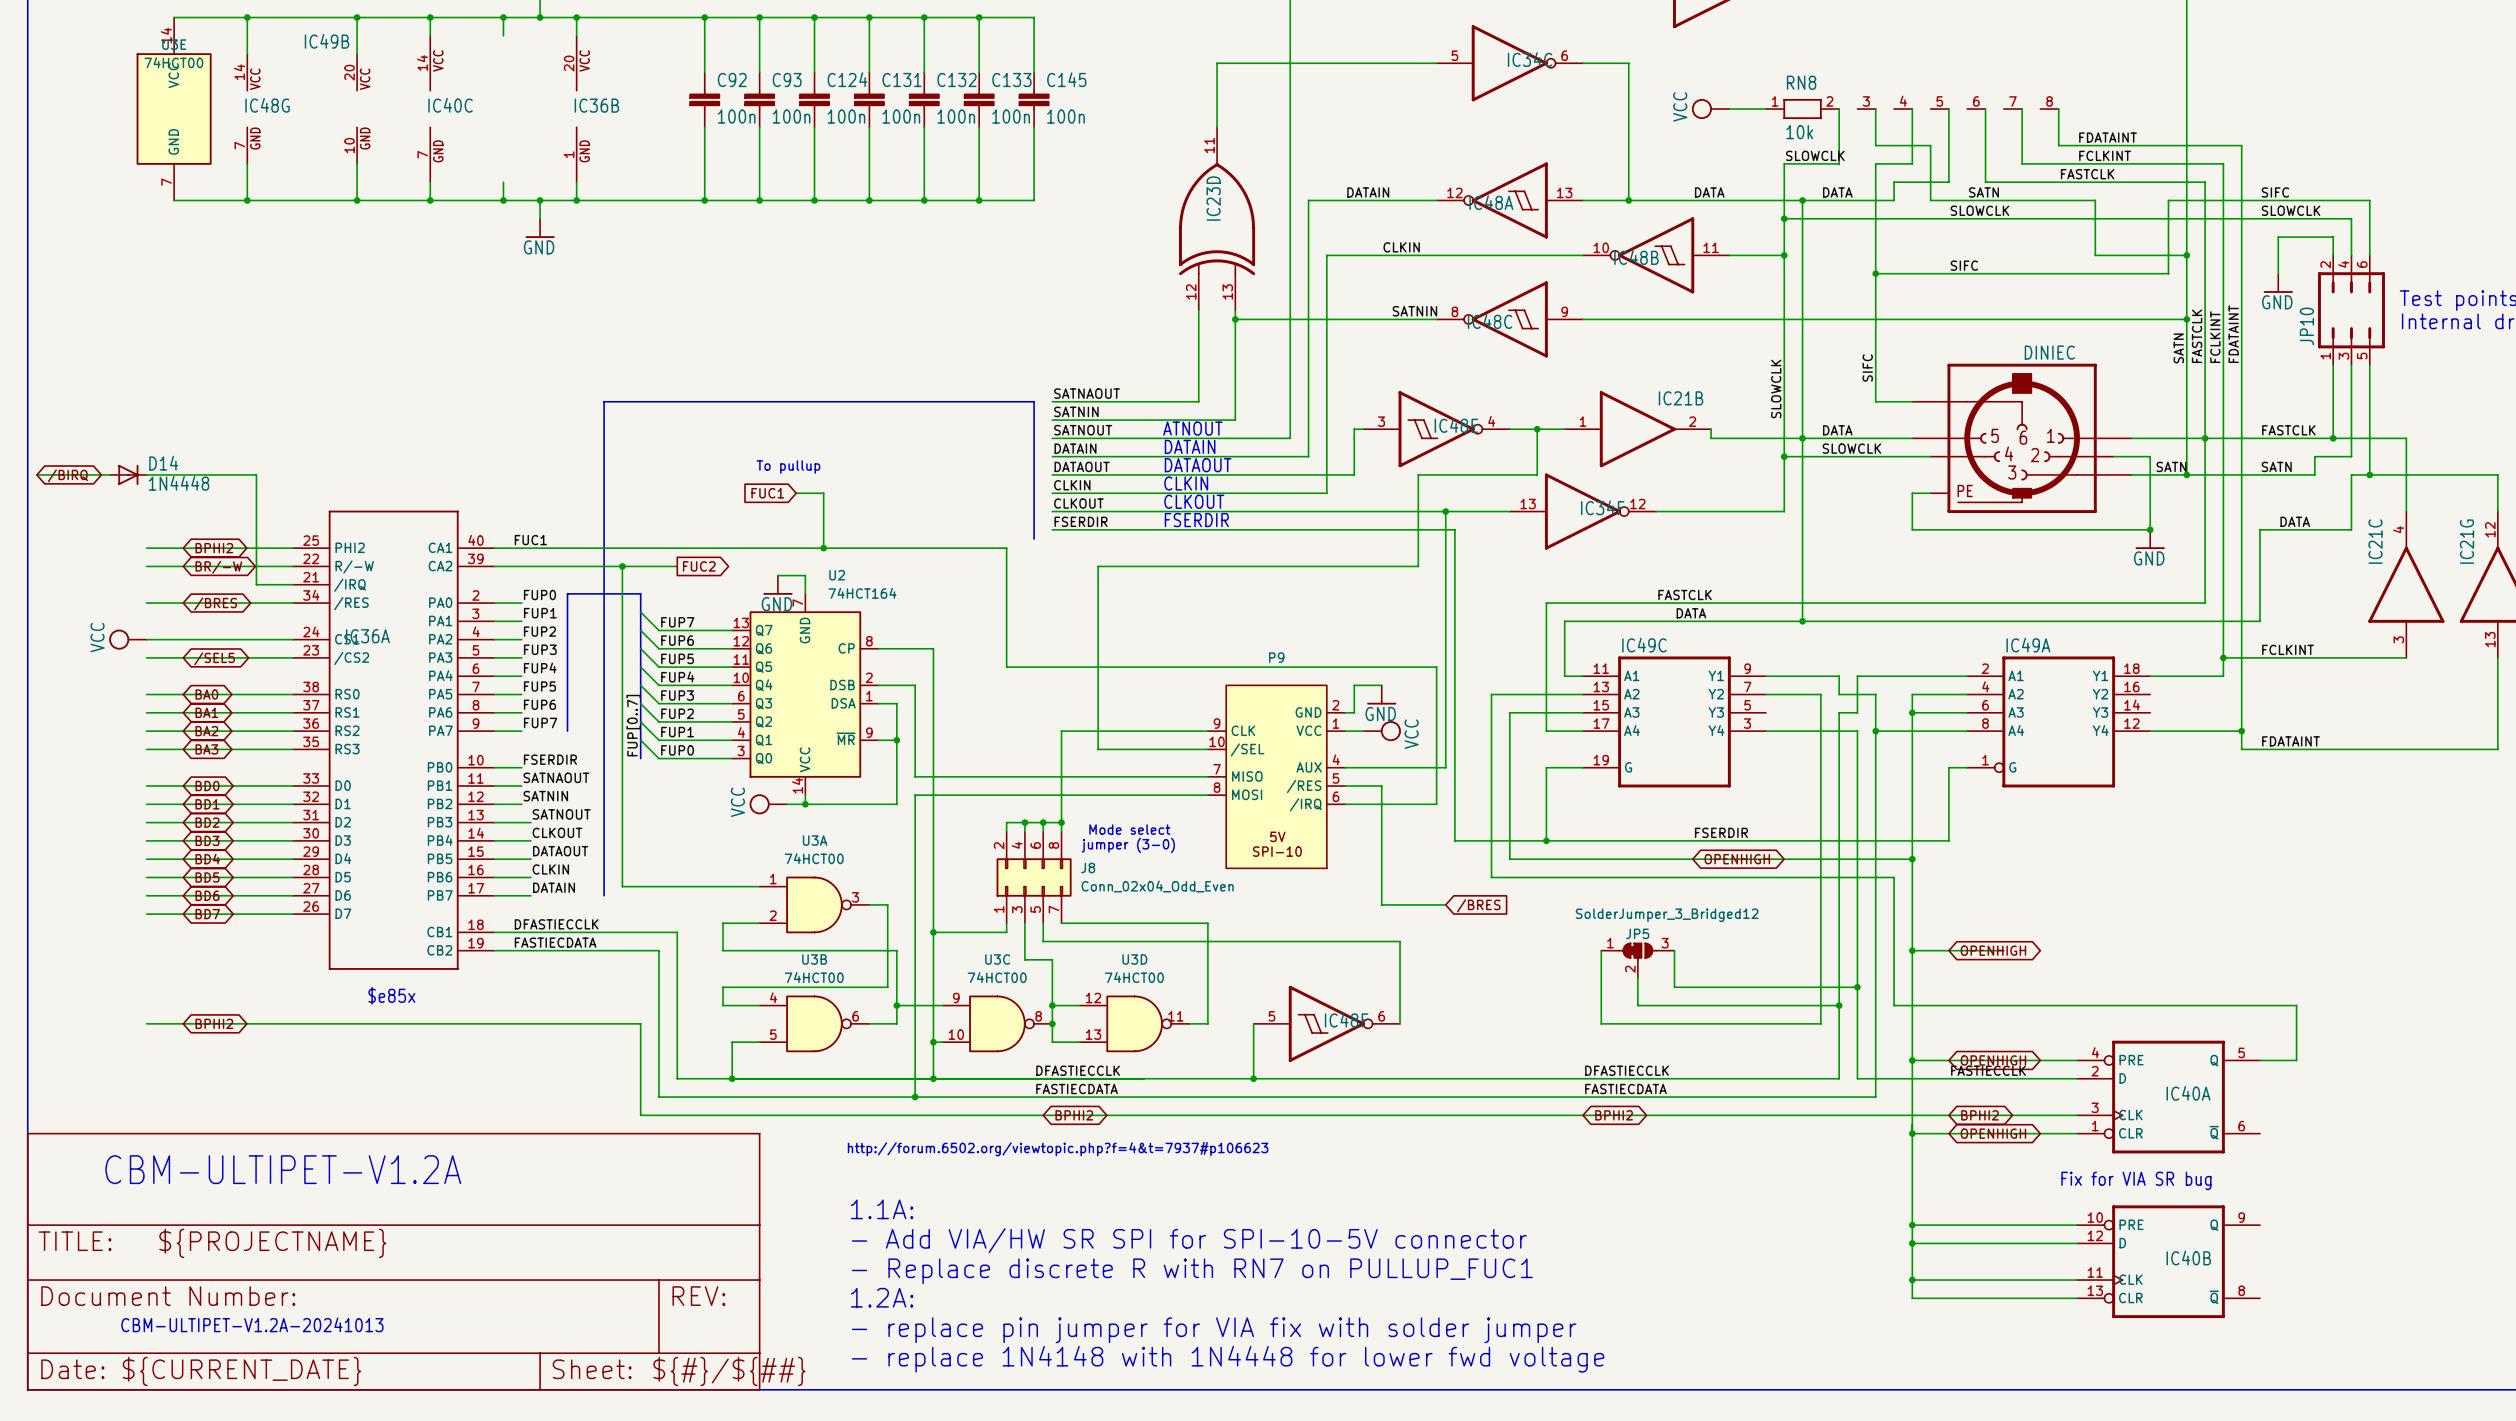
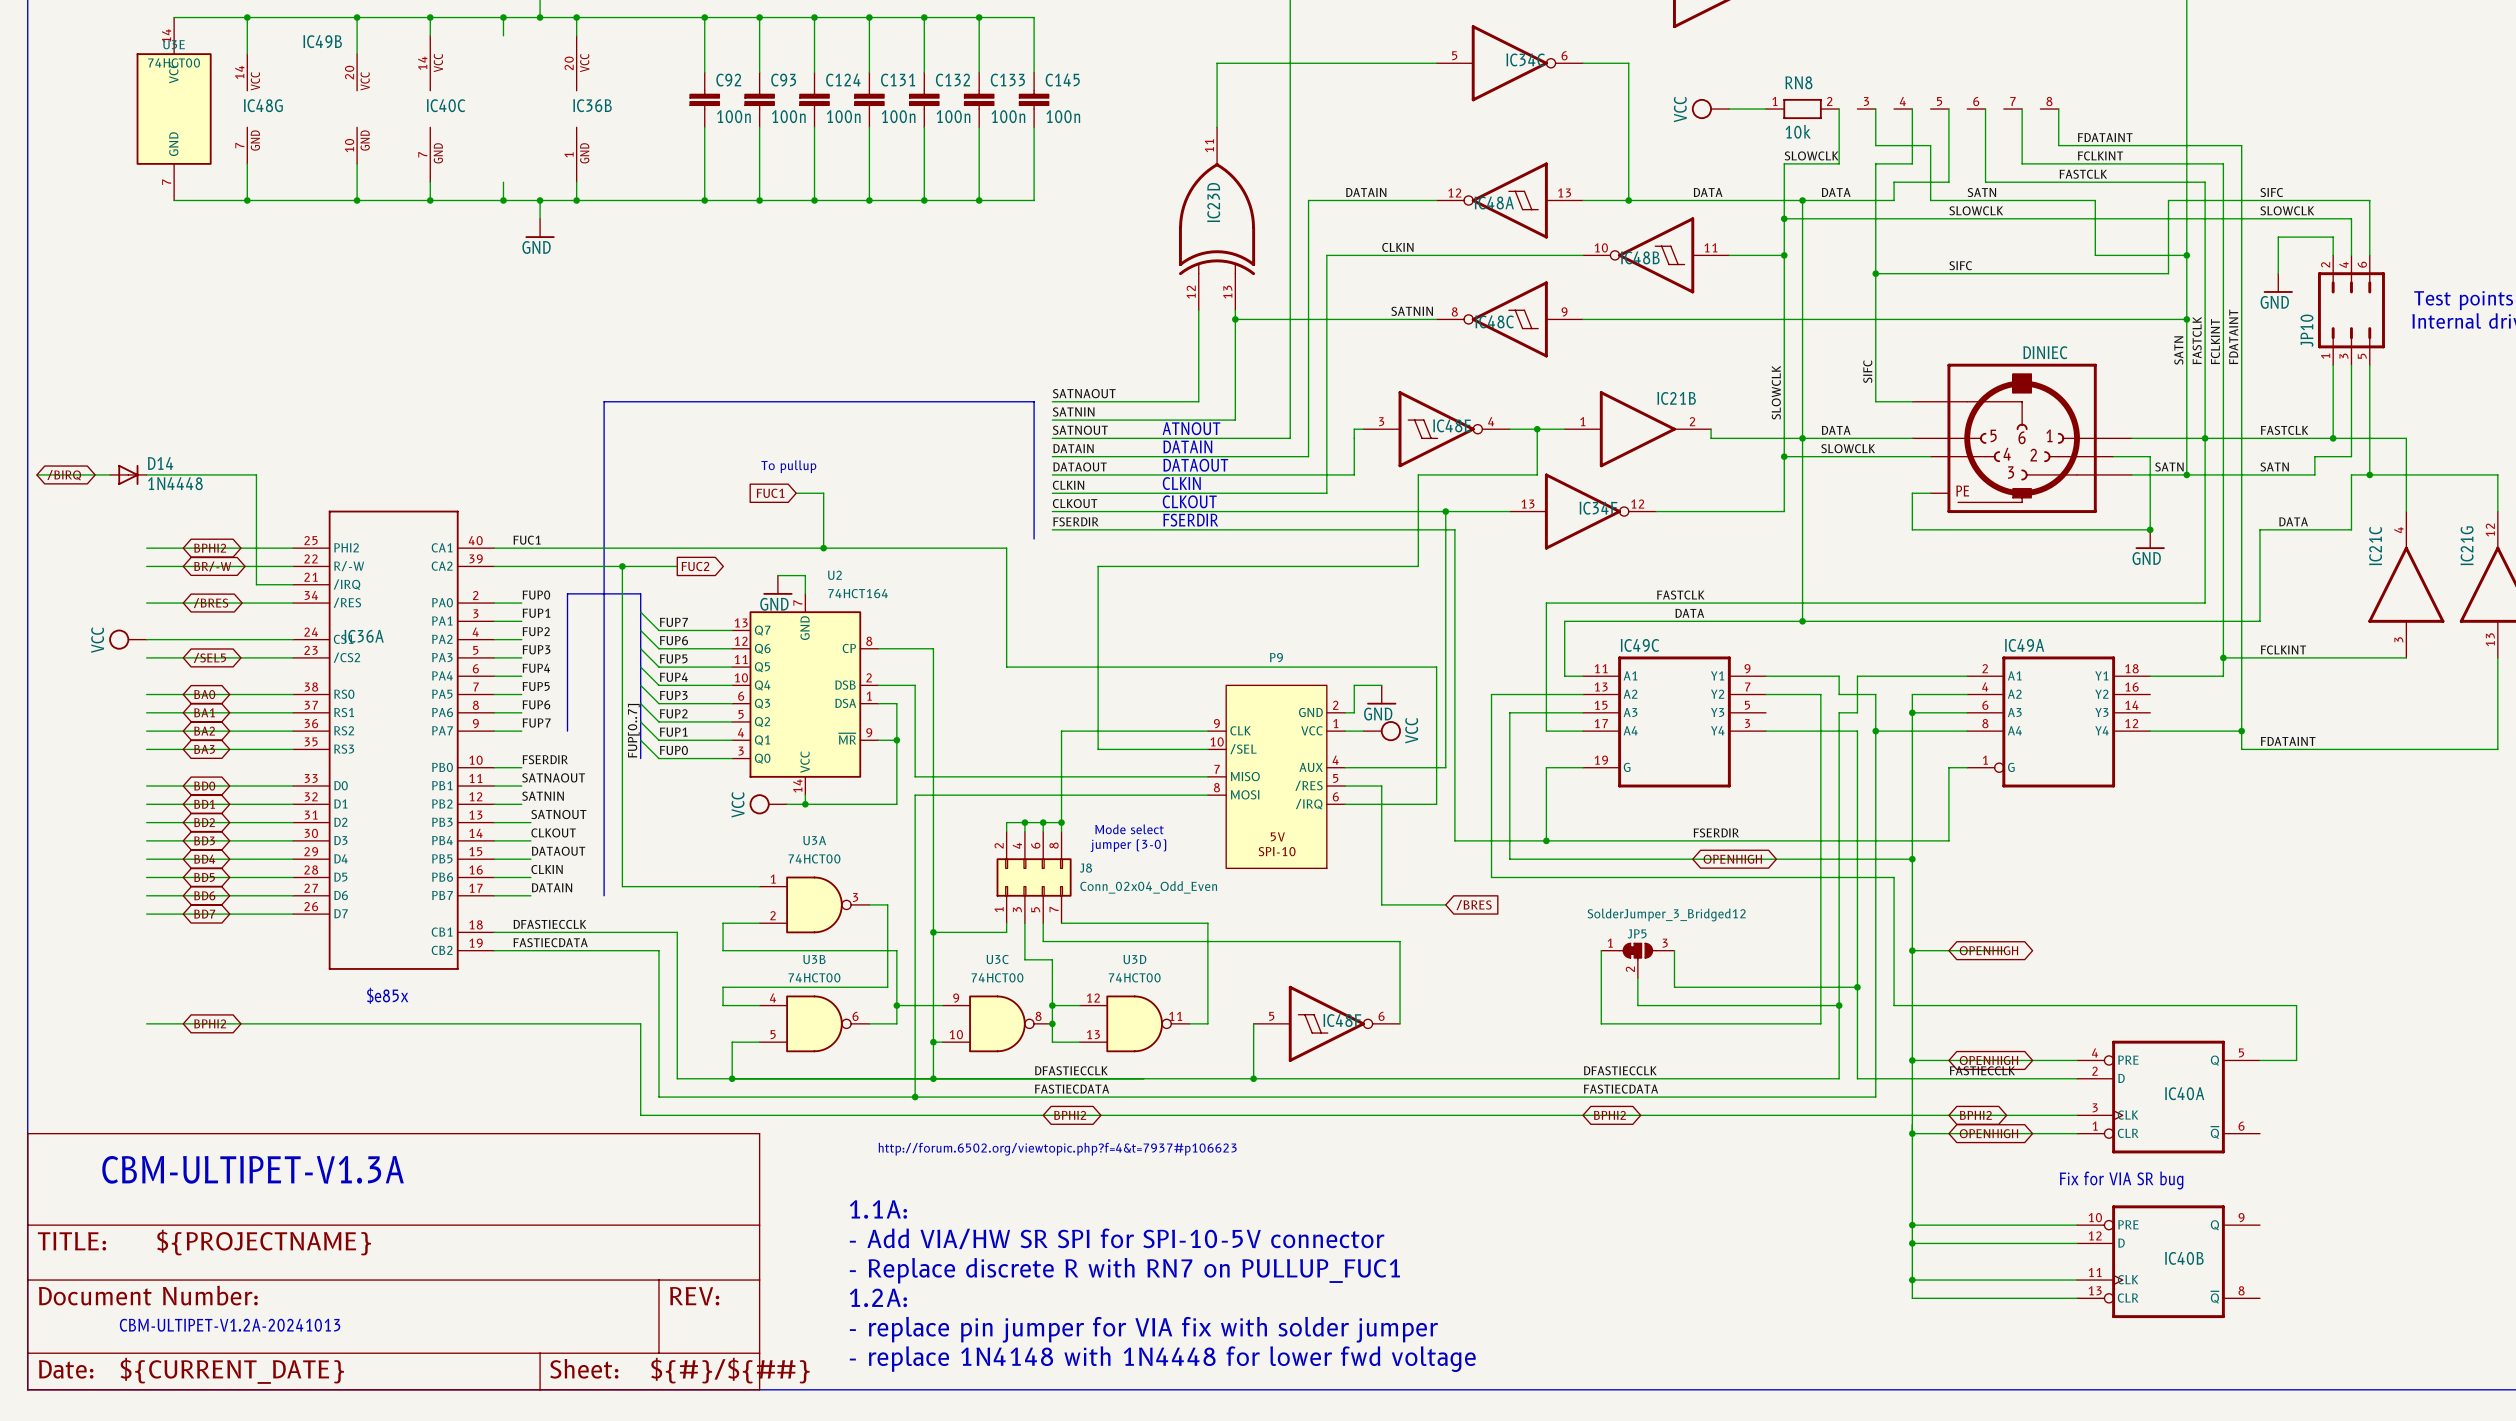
text: CBM-ULTIPET-V1.2A (283, 1169) -> CBM-ULTIPET-V1.3A (253, 1169)

